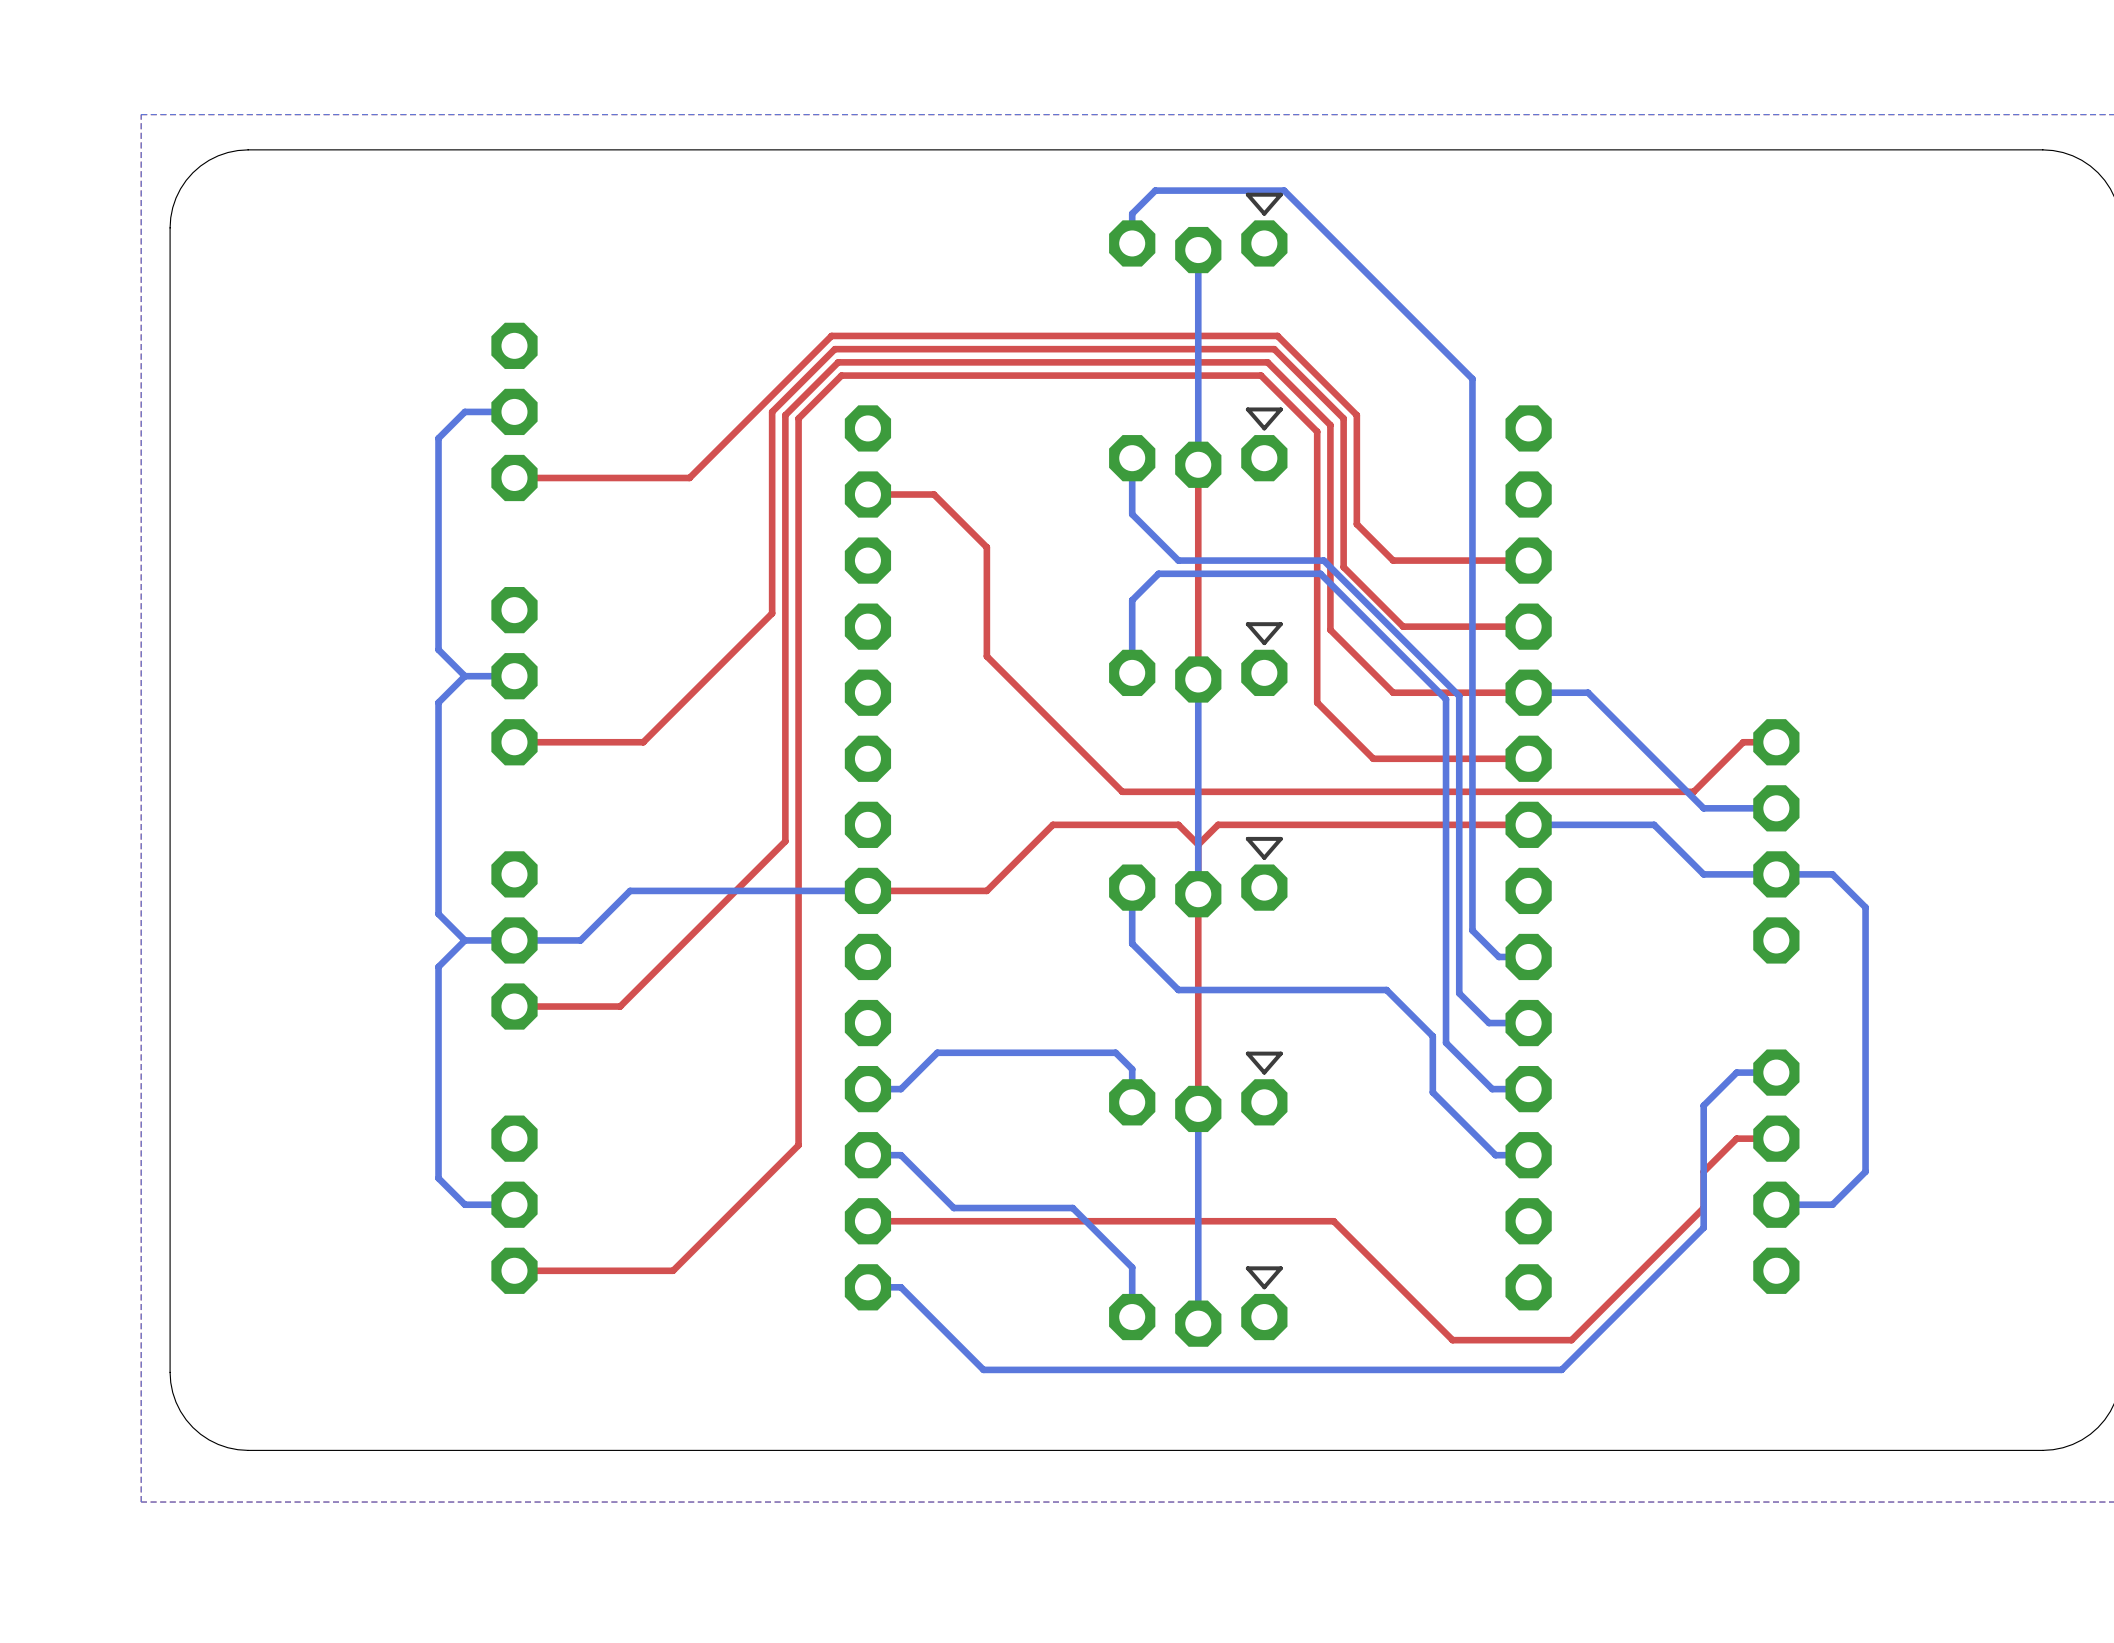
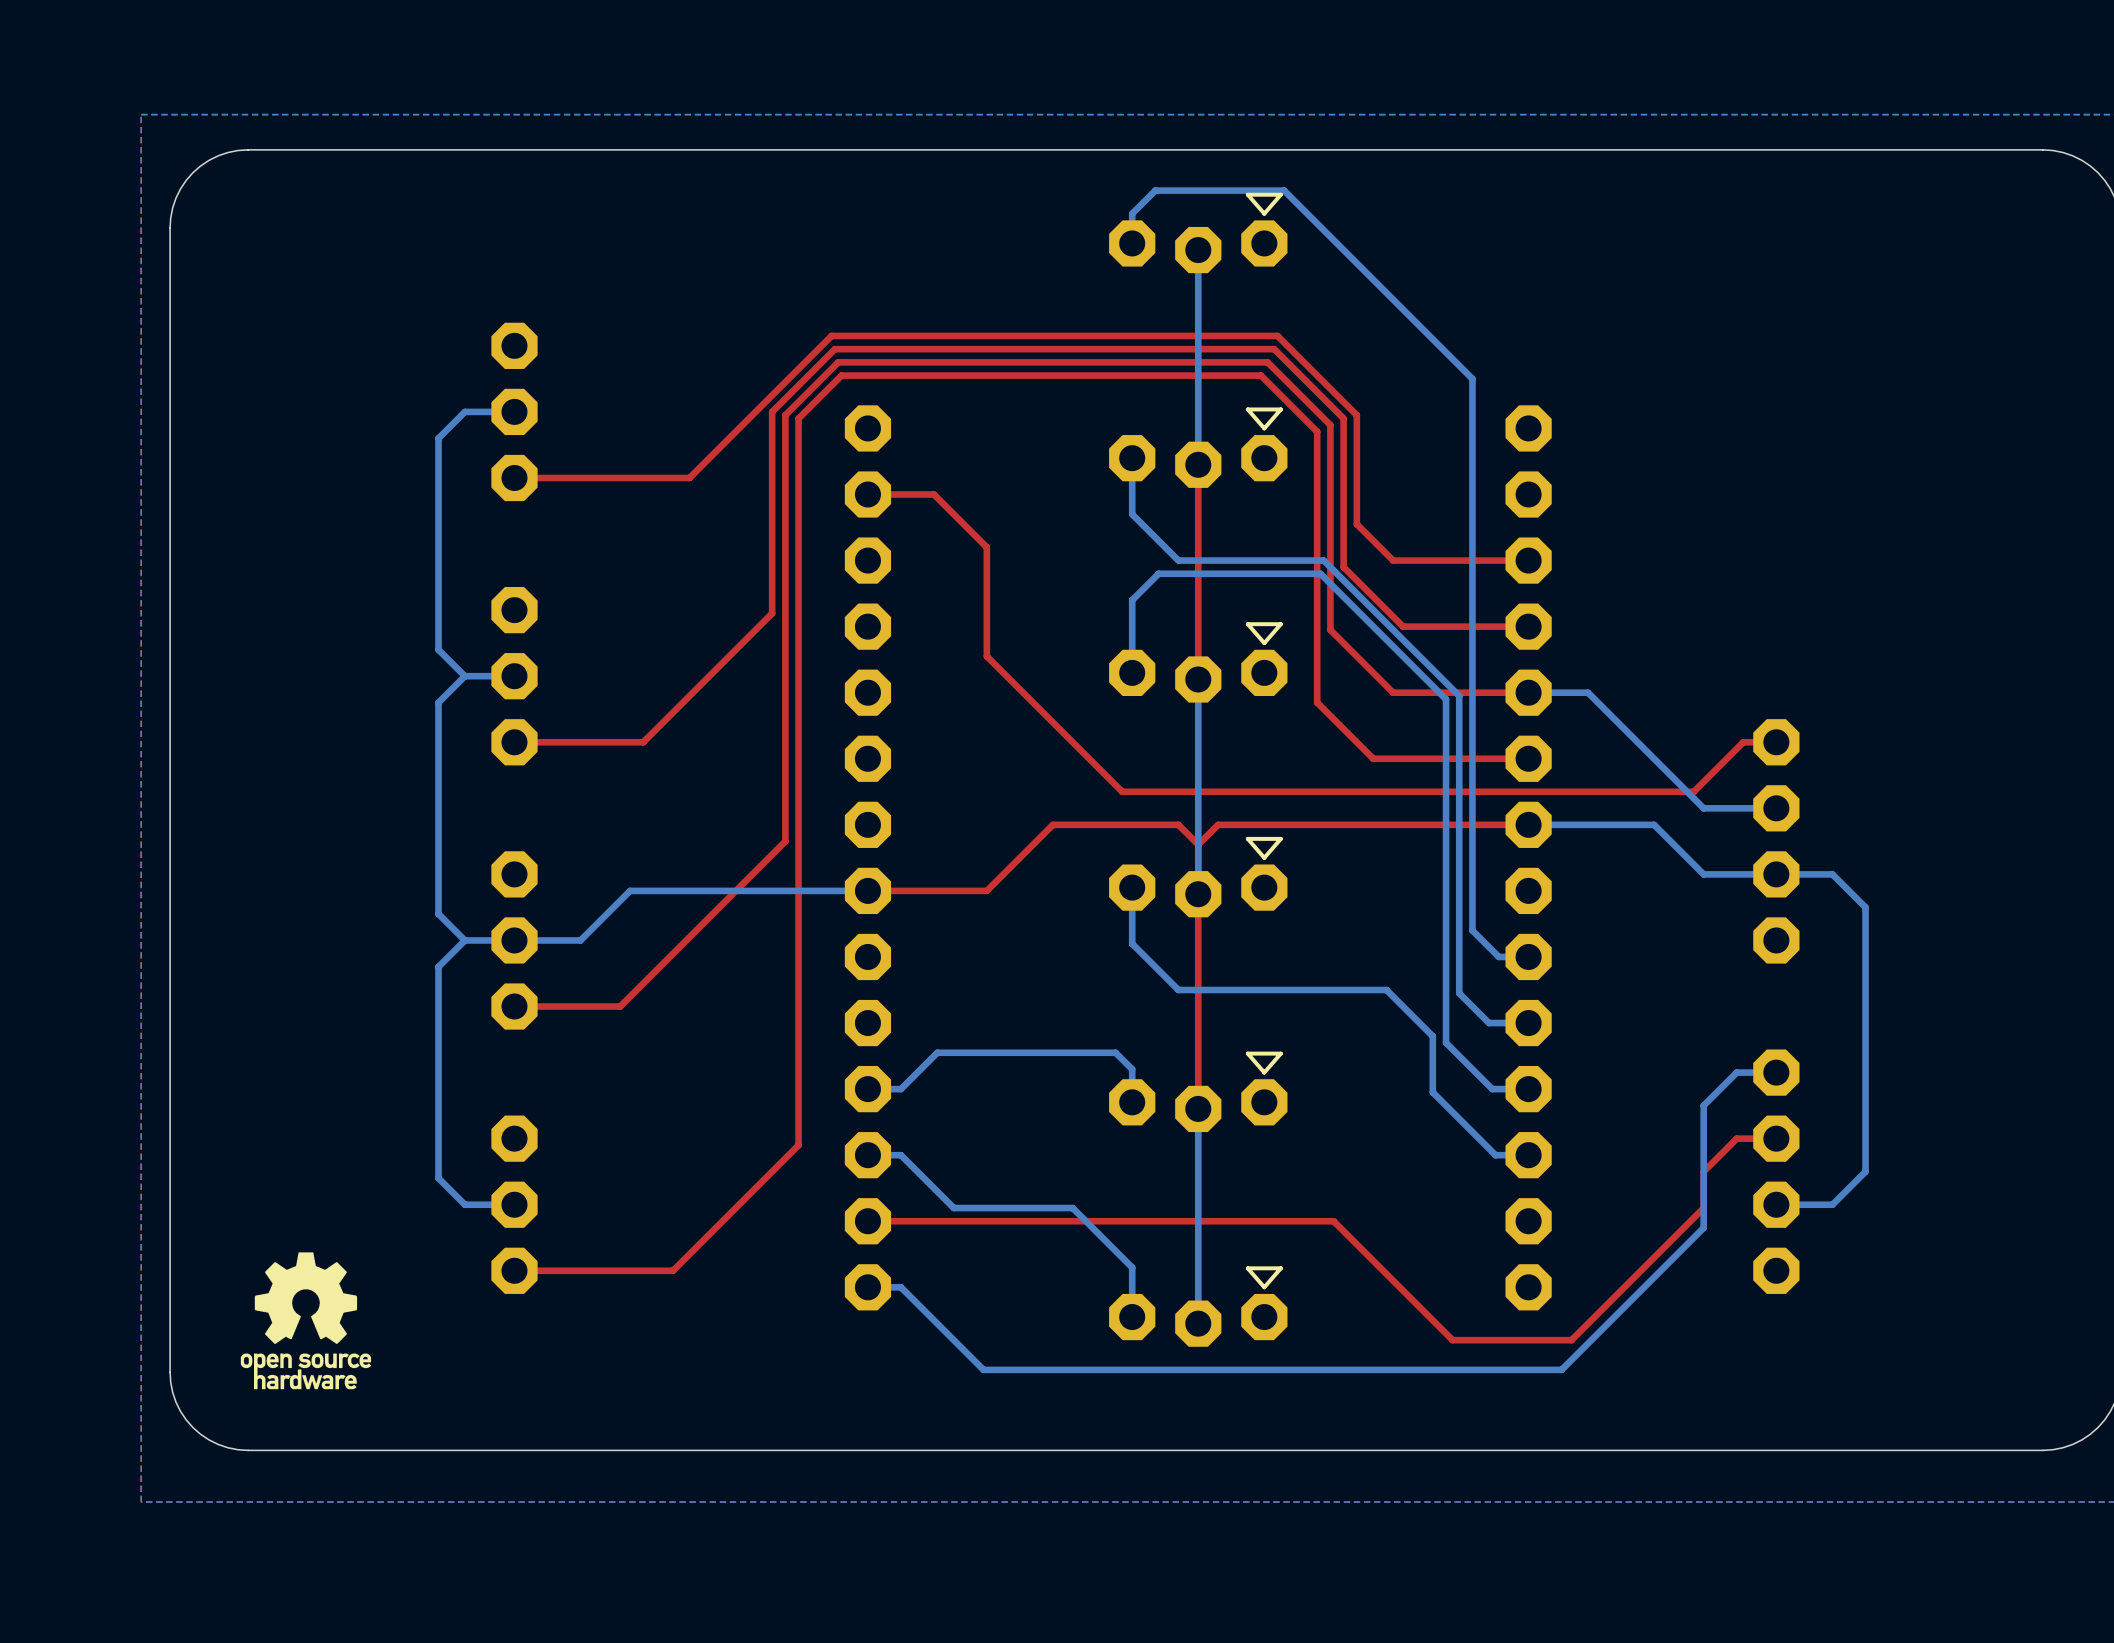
drawing: none -> [240, 1252, 372, 1390]

